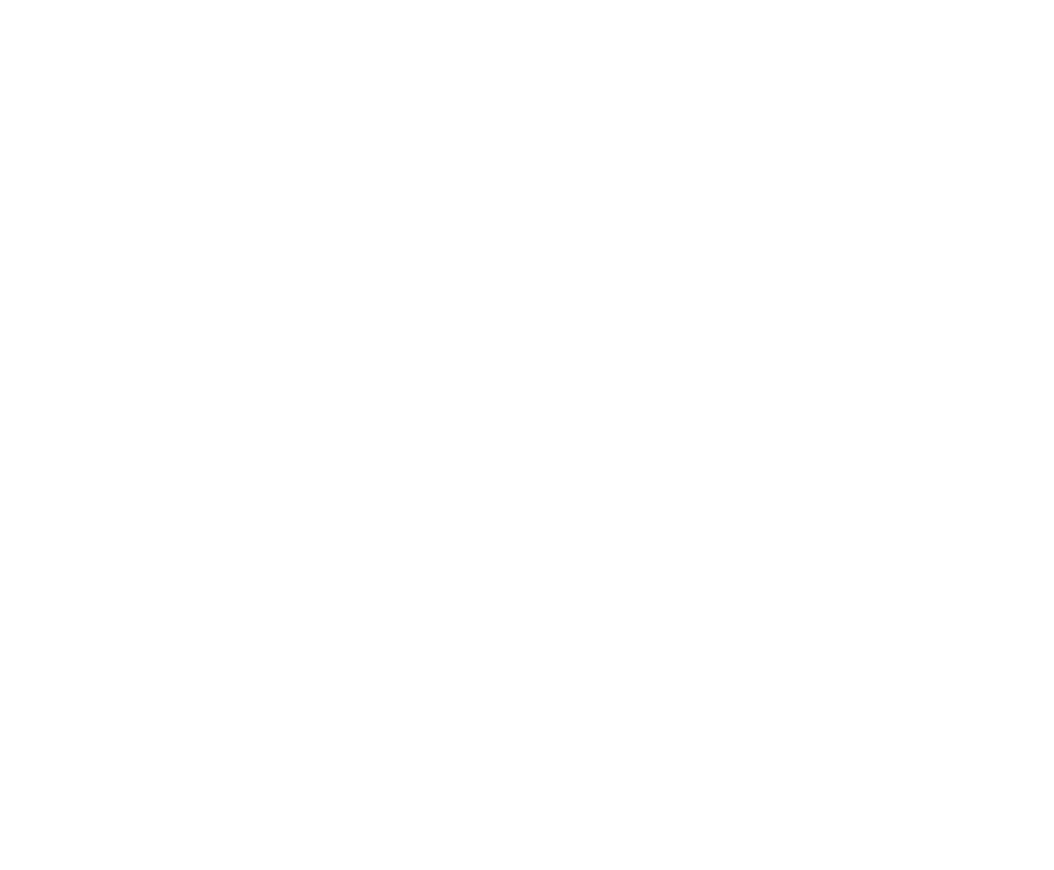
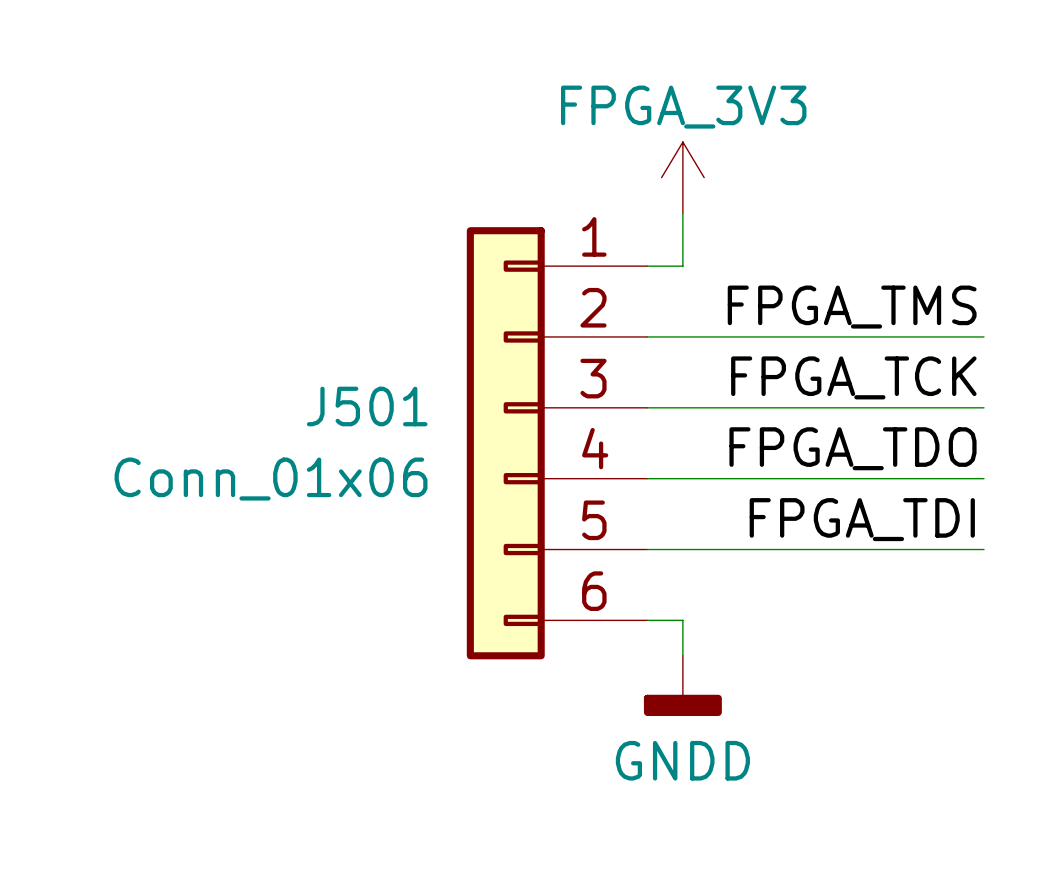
power symbol: none -> FPGA_3V3 (682, 177)
wire: none -> (682, 212) (682, 266) (647, 266)
label: none -> FPGA_TMS (852, 307)
wire: none -> (647, 336) (984, 336)
label: none -> FPGA_TCK (853, 377)
wire: none -> (647, 407) (984, 407)
J501: none -> Conn_01x06 (557, 443)
label: none -> FPGA_TDO (853, 448)
wire: none -> (647, 478) (984, 478)
label: none -> FPGA_TDI (862, 519)
wire: none -> (647, 549) (984, 549)
wire: none -> (647, 620) (682, 620) (682, 655)
power symbol: none -> GNDD (682, 685)

